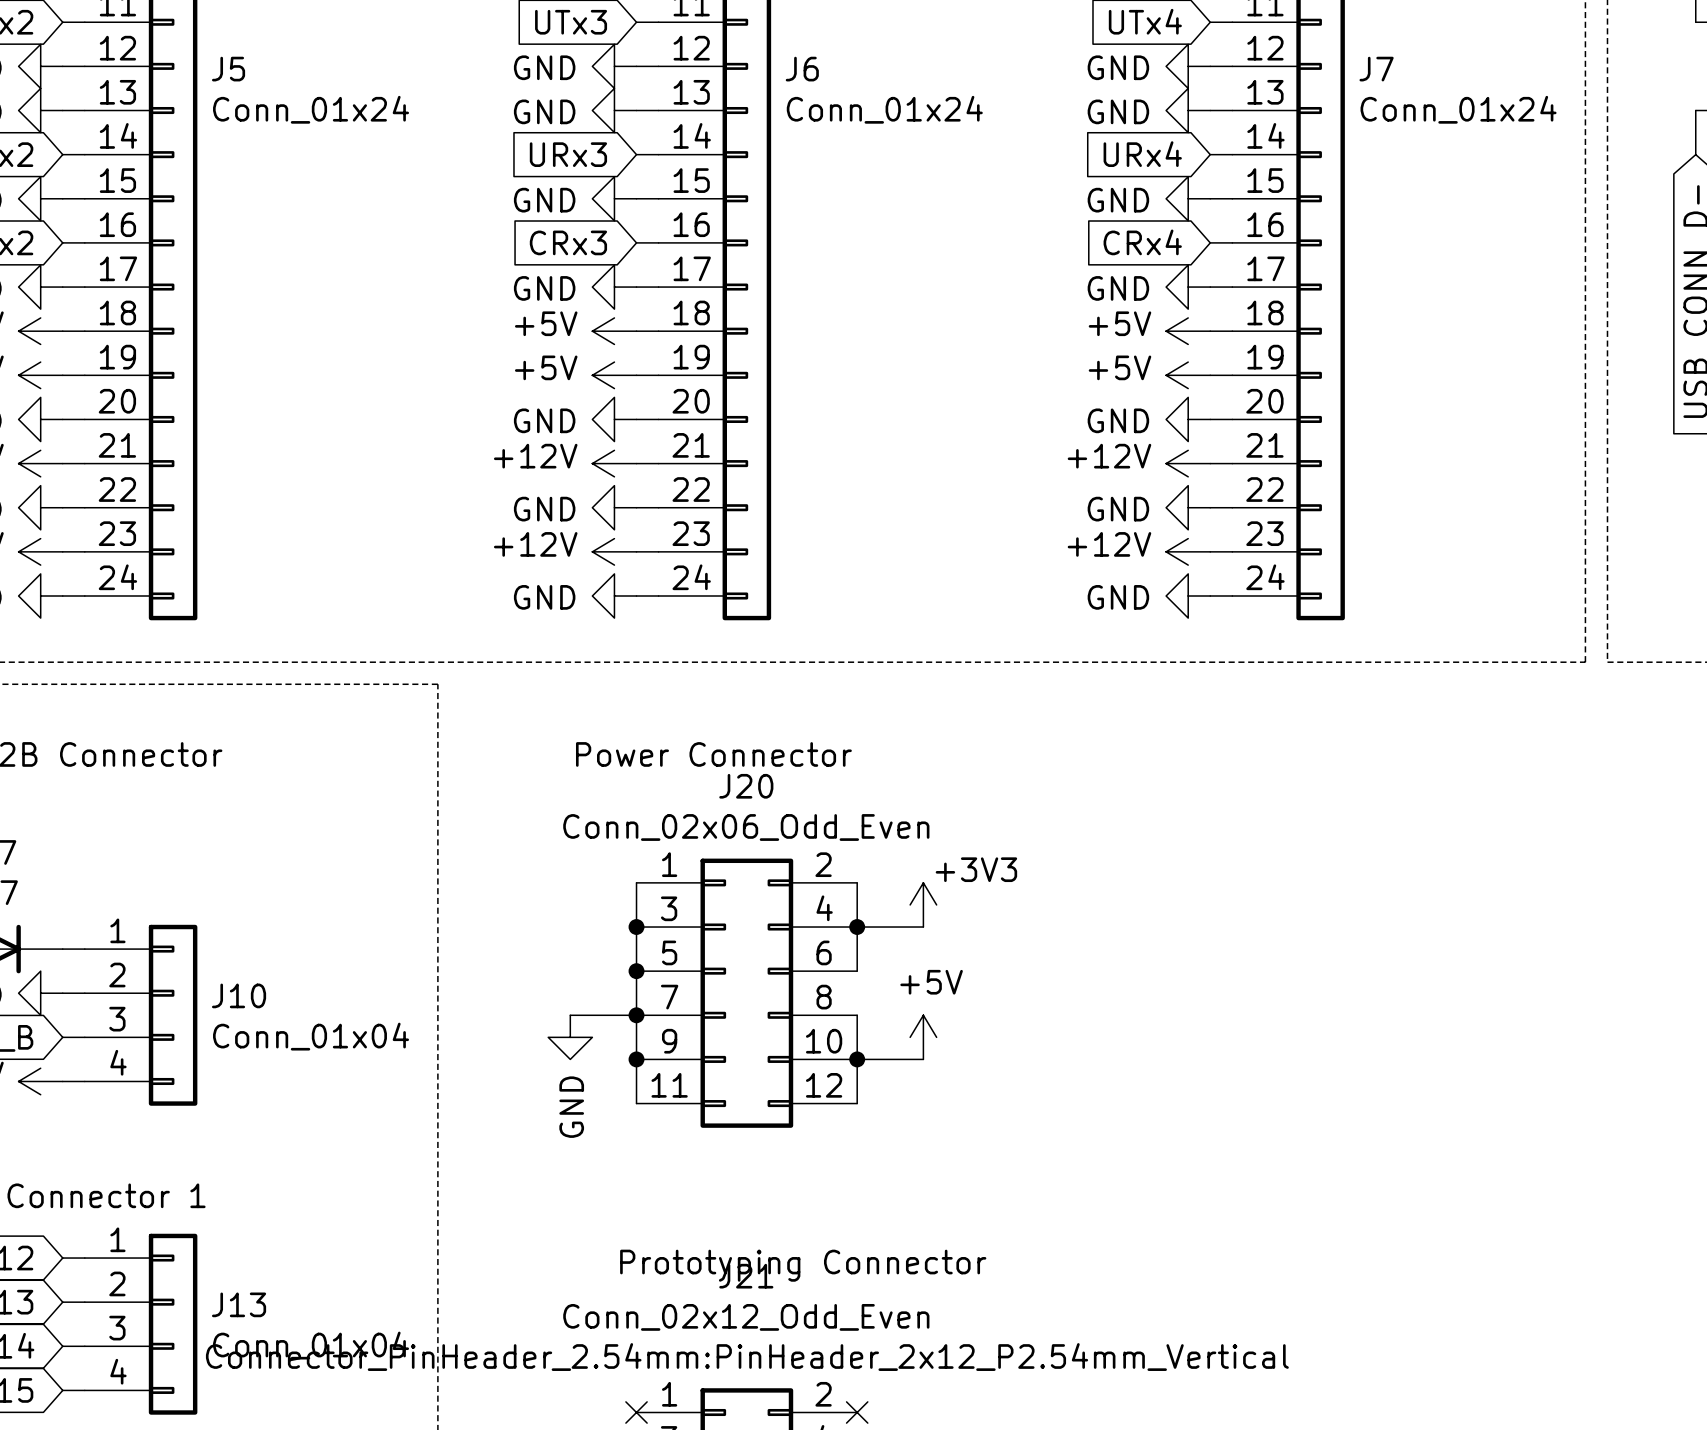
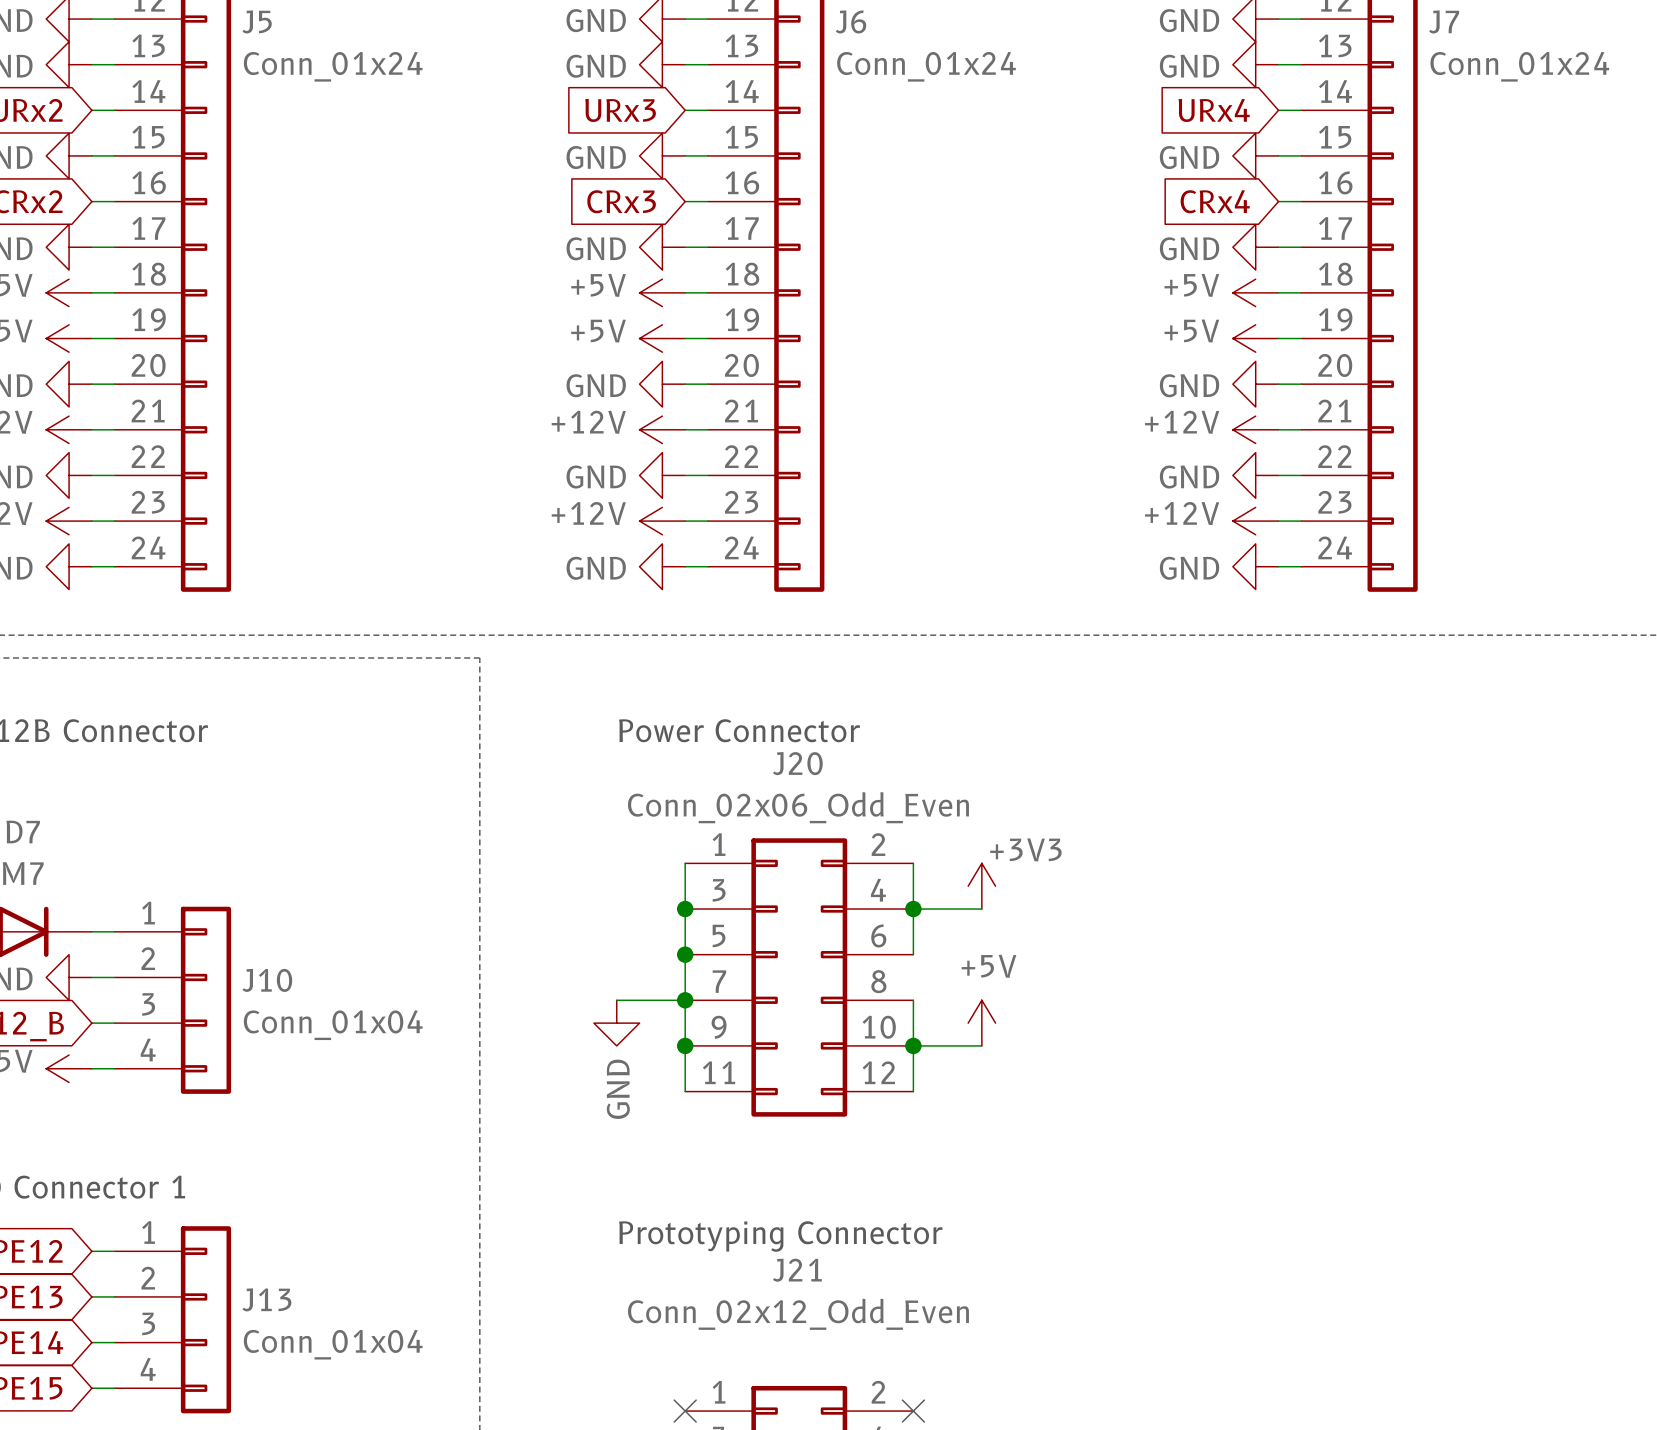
text position: Prototyping Connector (803, 1265) -> Prototyping Connector (780, 1236)
J21 text: Connector_PinHeader_2.54mm:PinHeader_2x12_P2.54mm_Vertical (747, 1357) -> none

